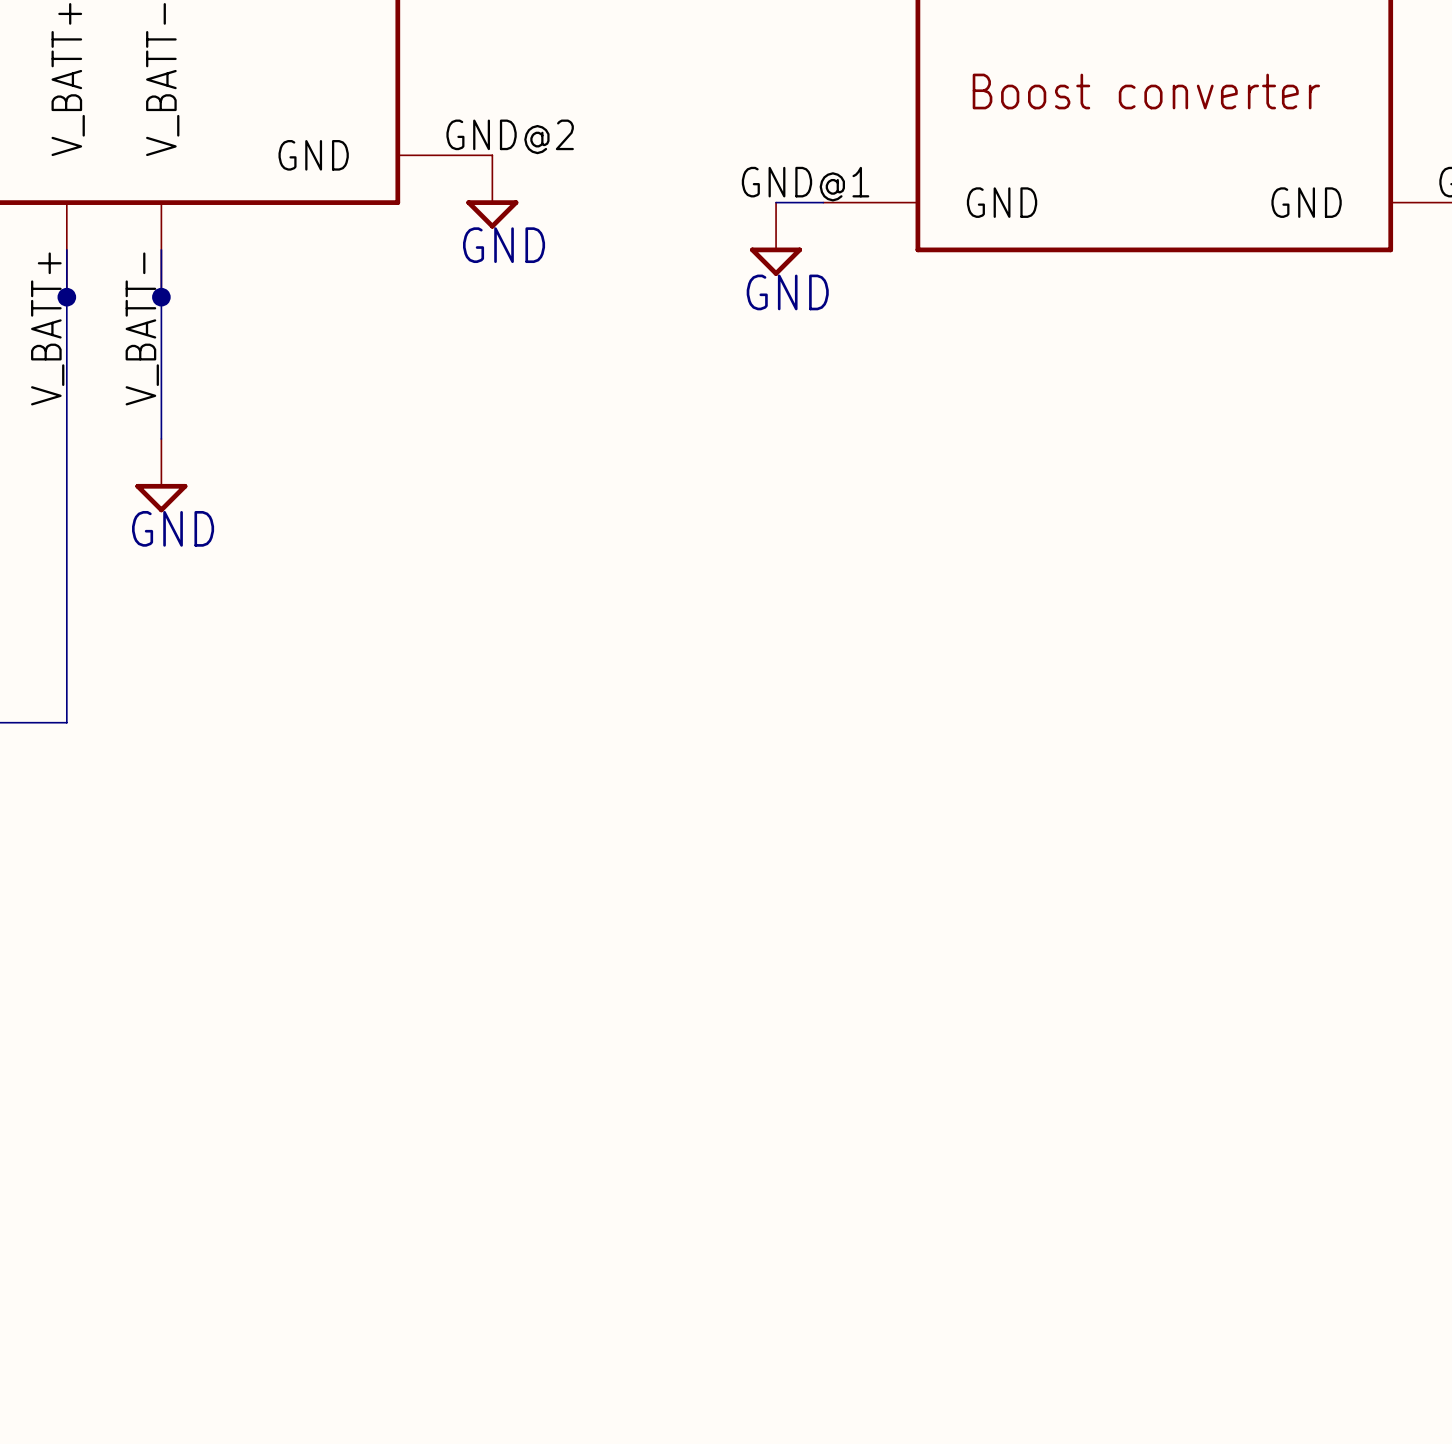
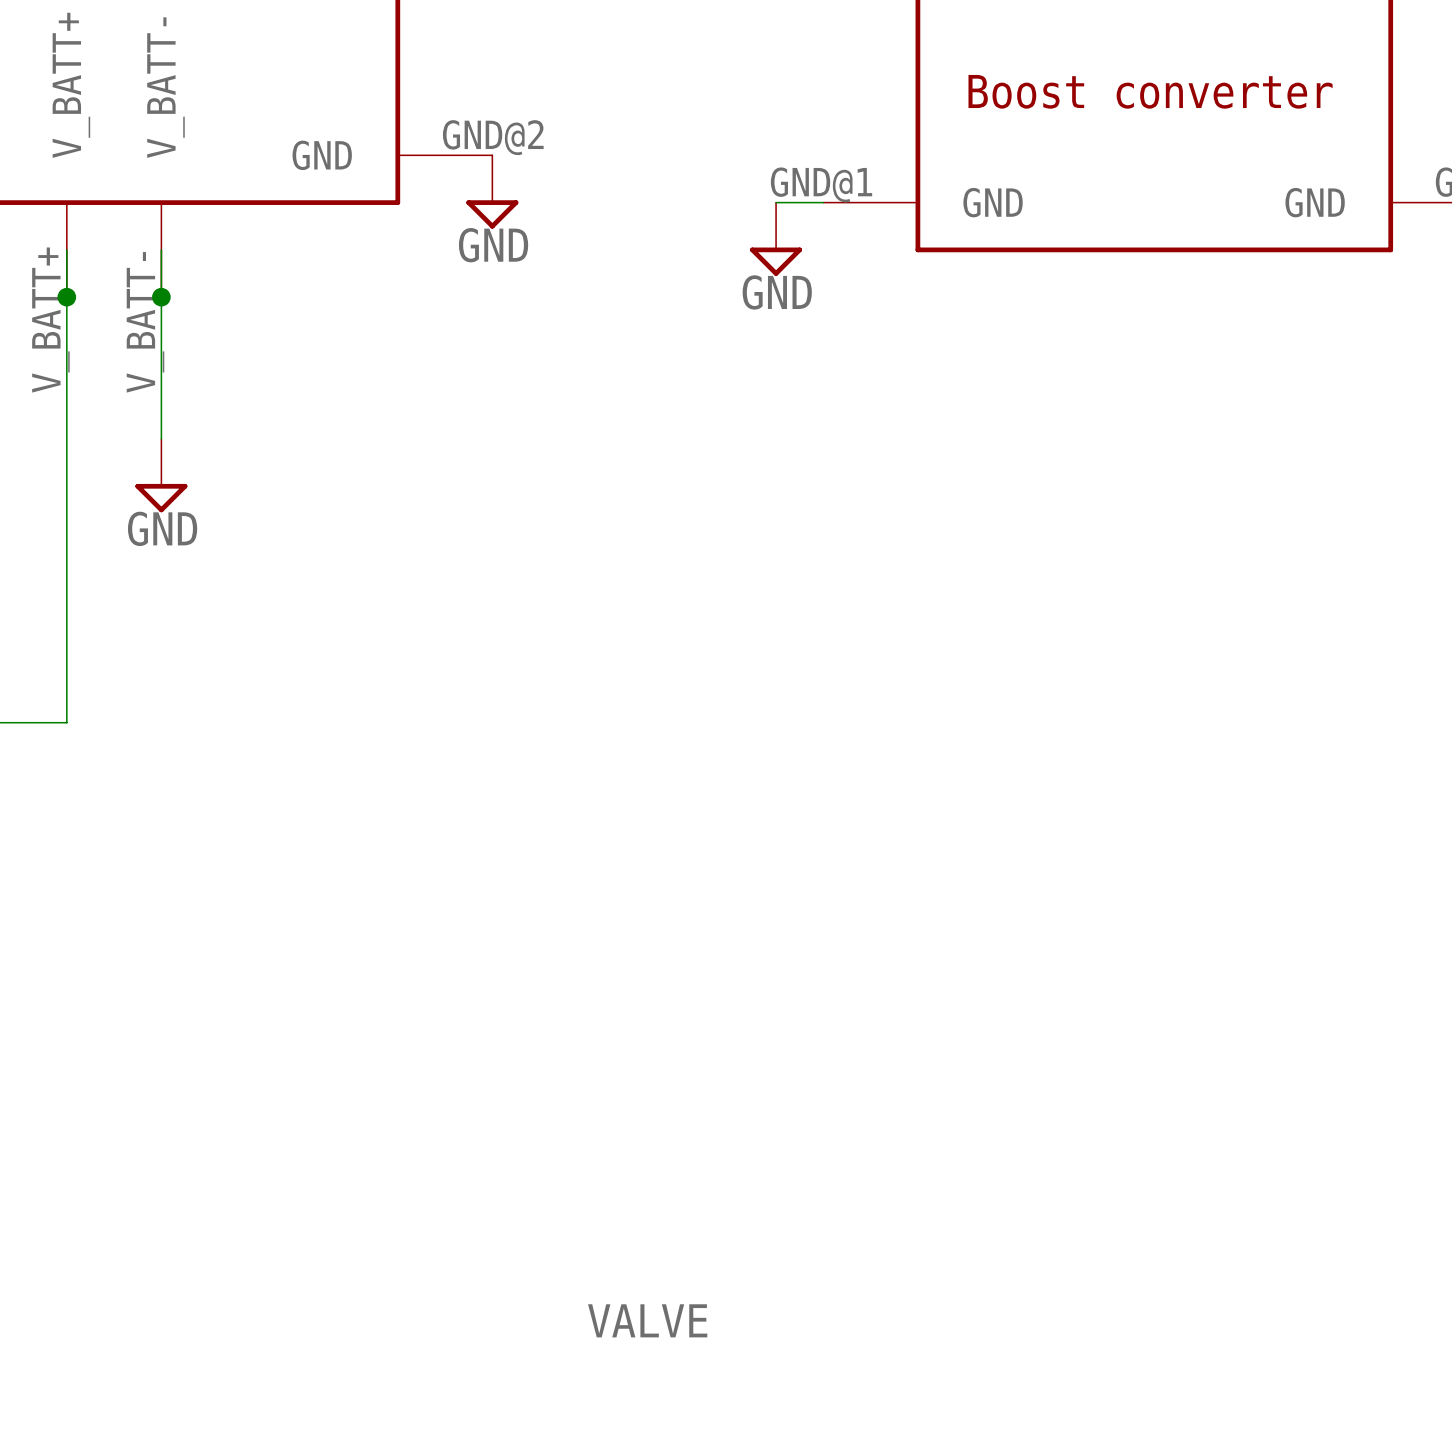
label: none -> VALVE (647, 1320)

